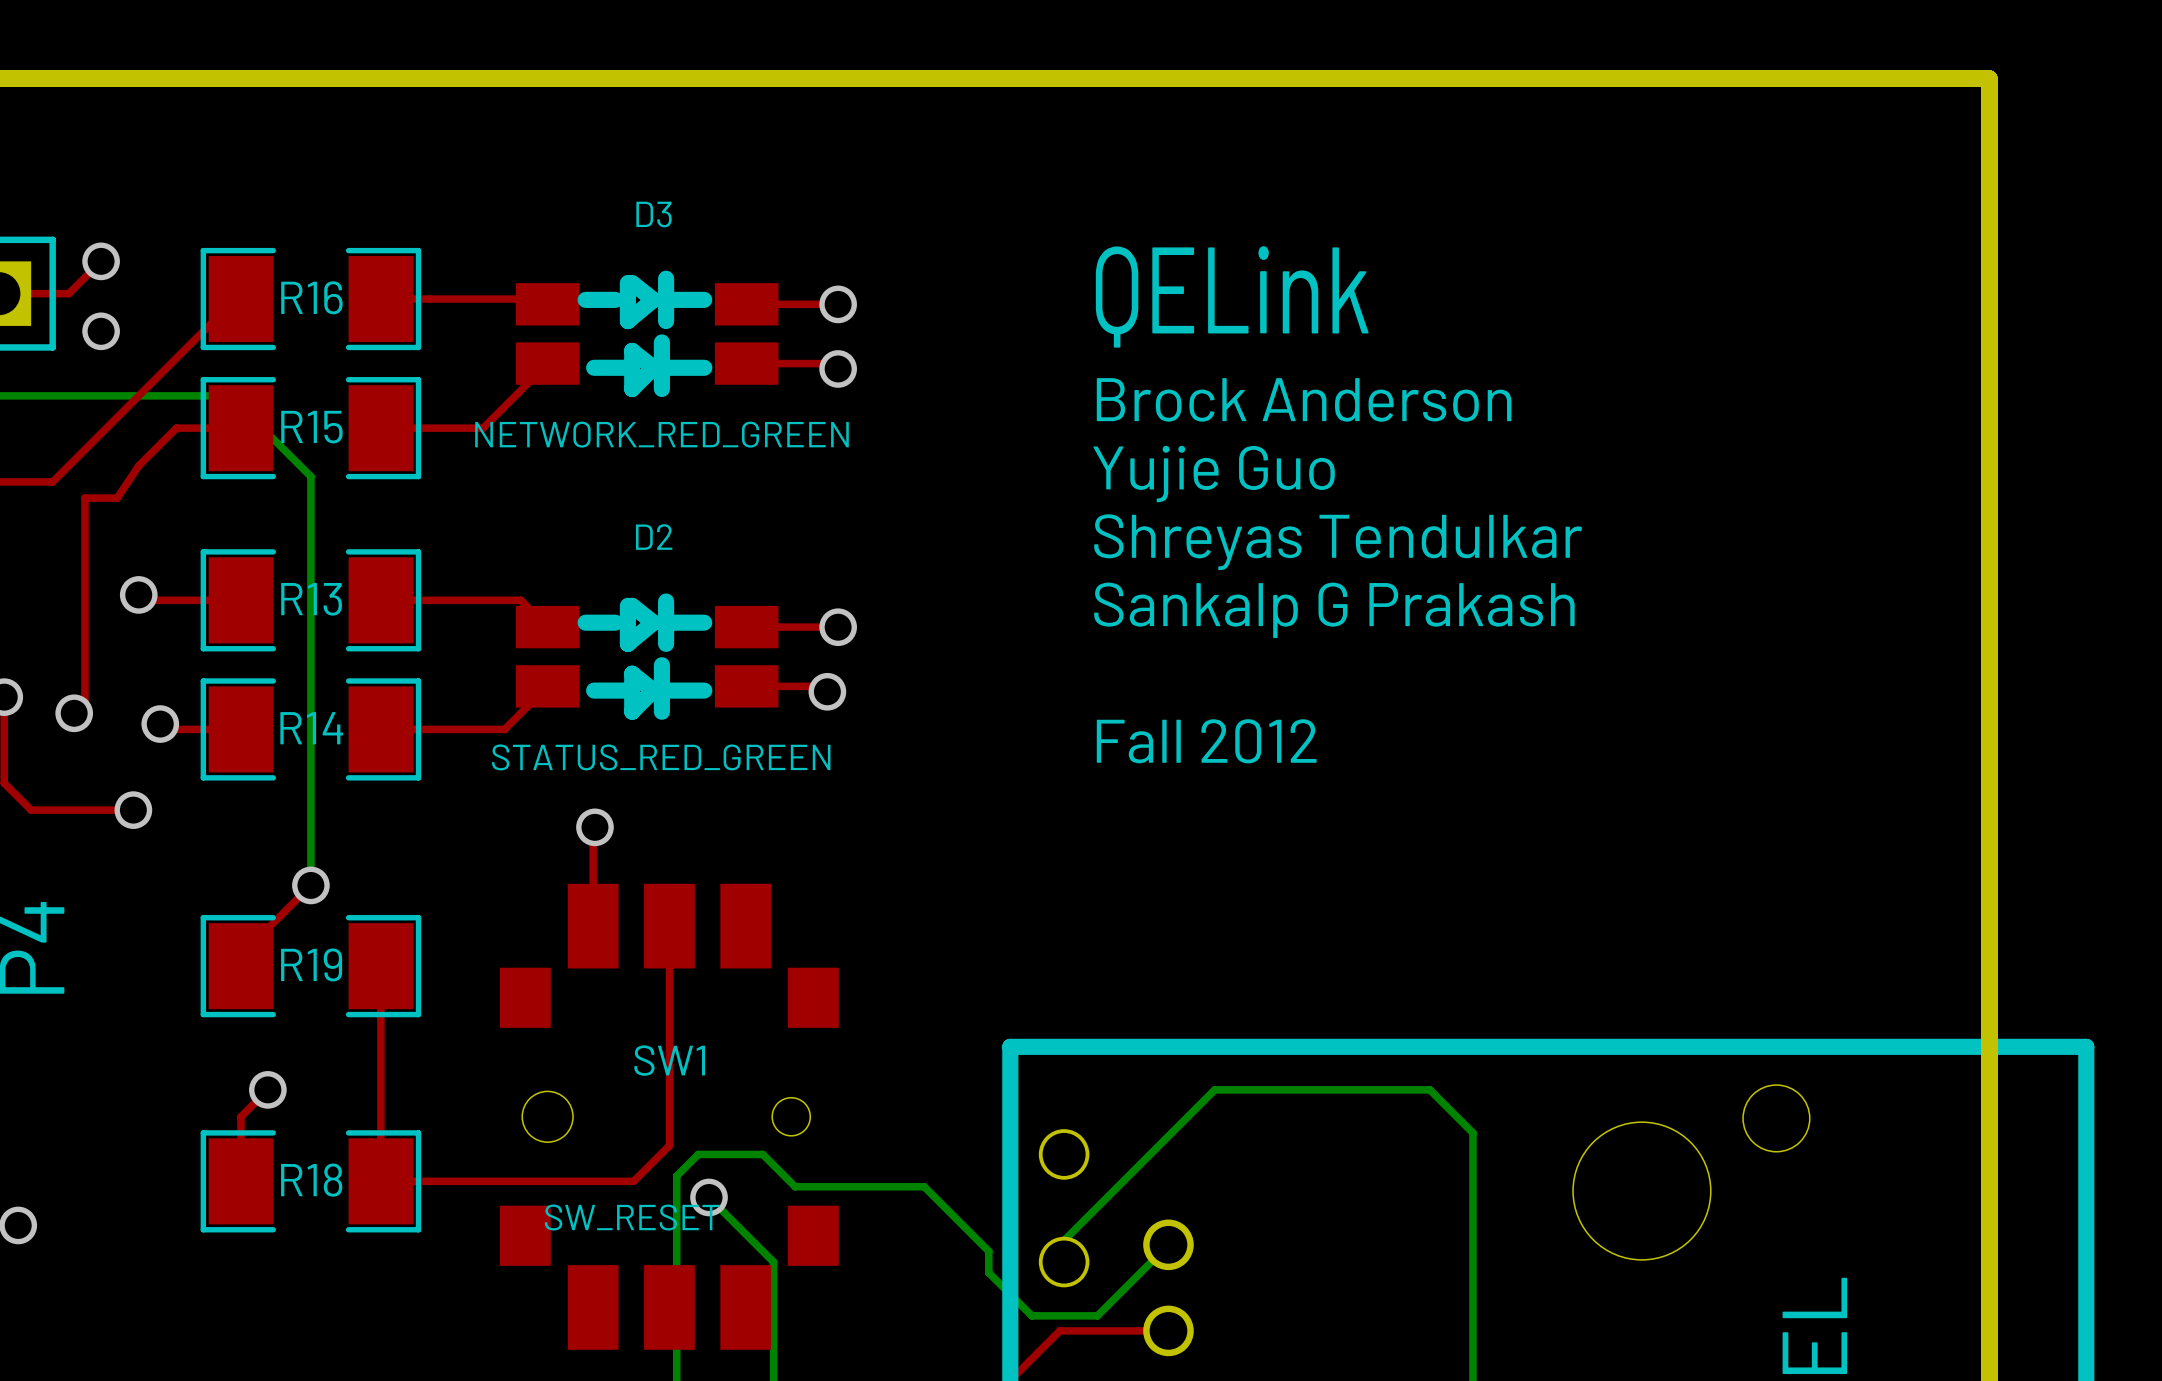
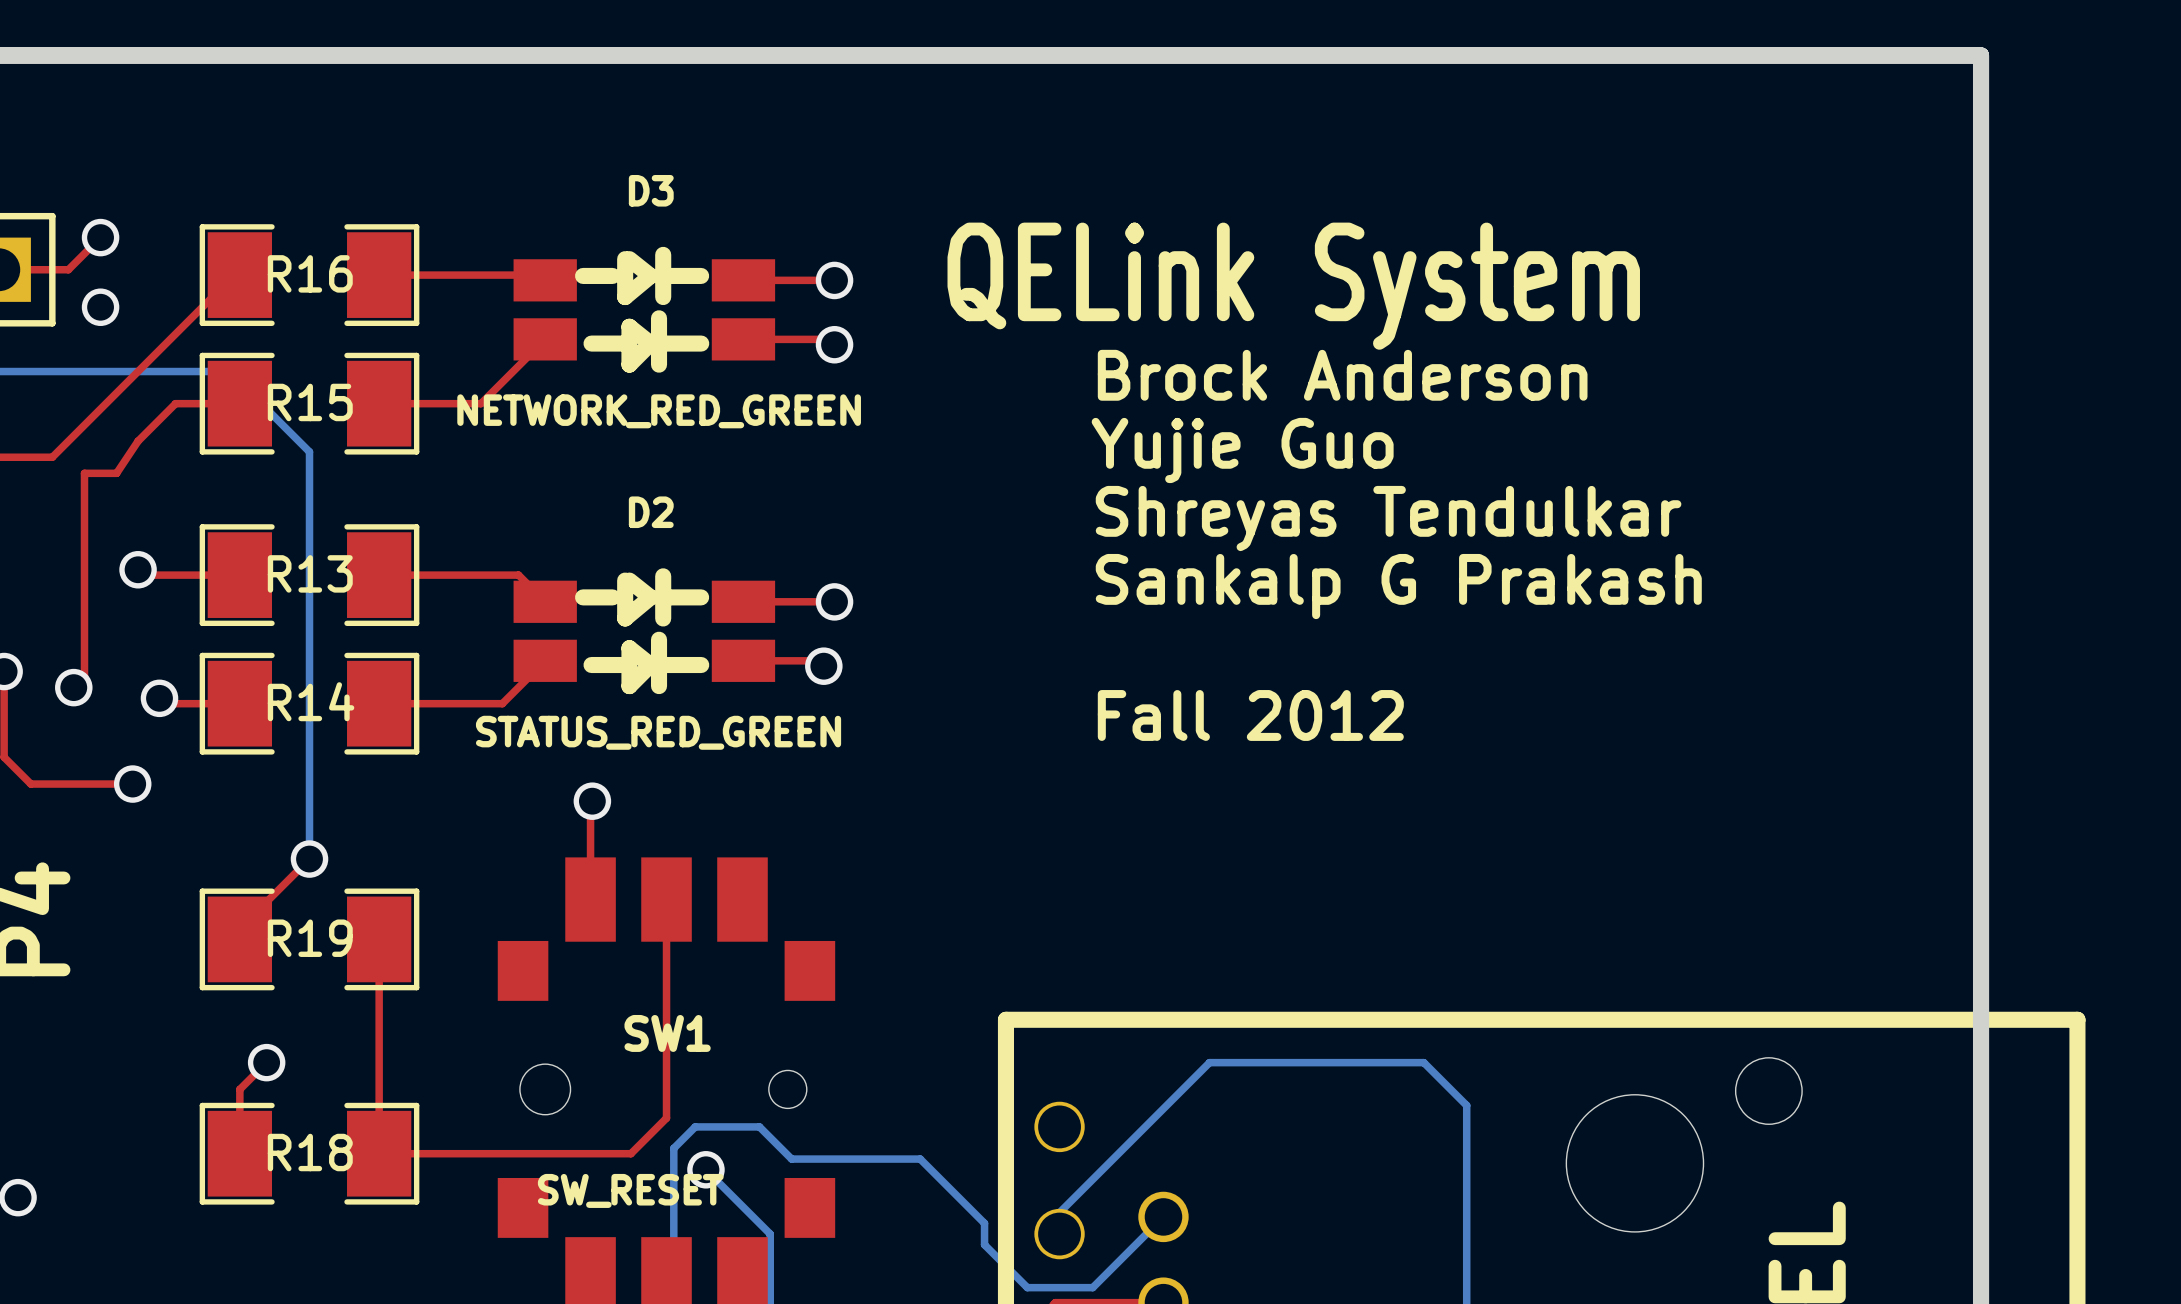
text: QELink (1232, 296) -> QELink System (1293, 286)

